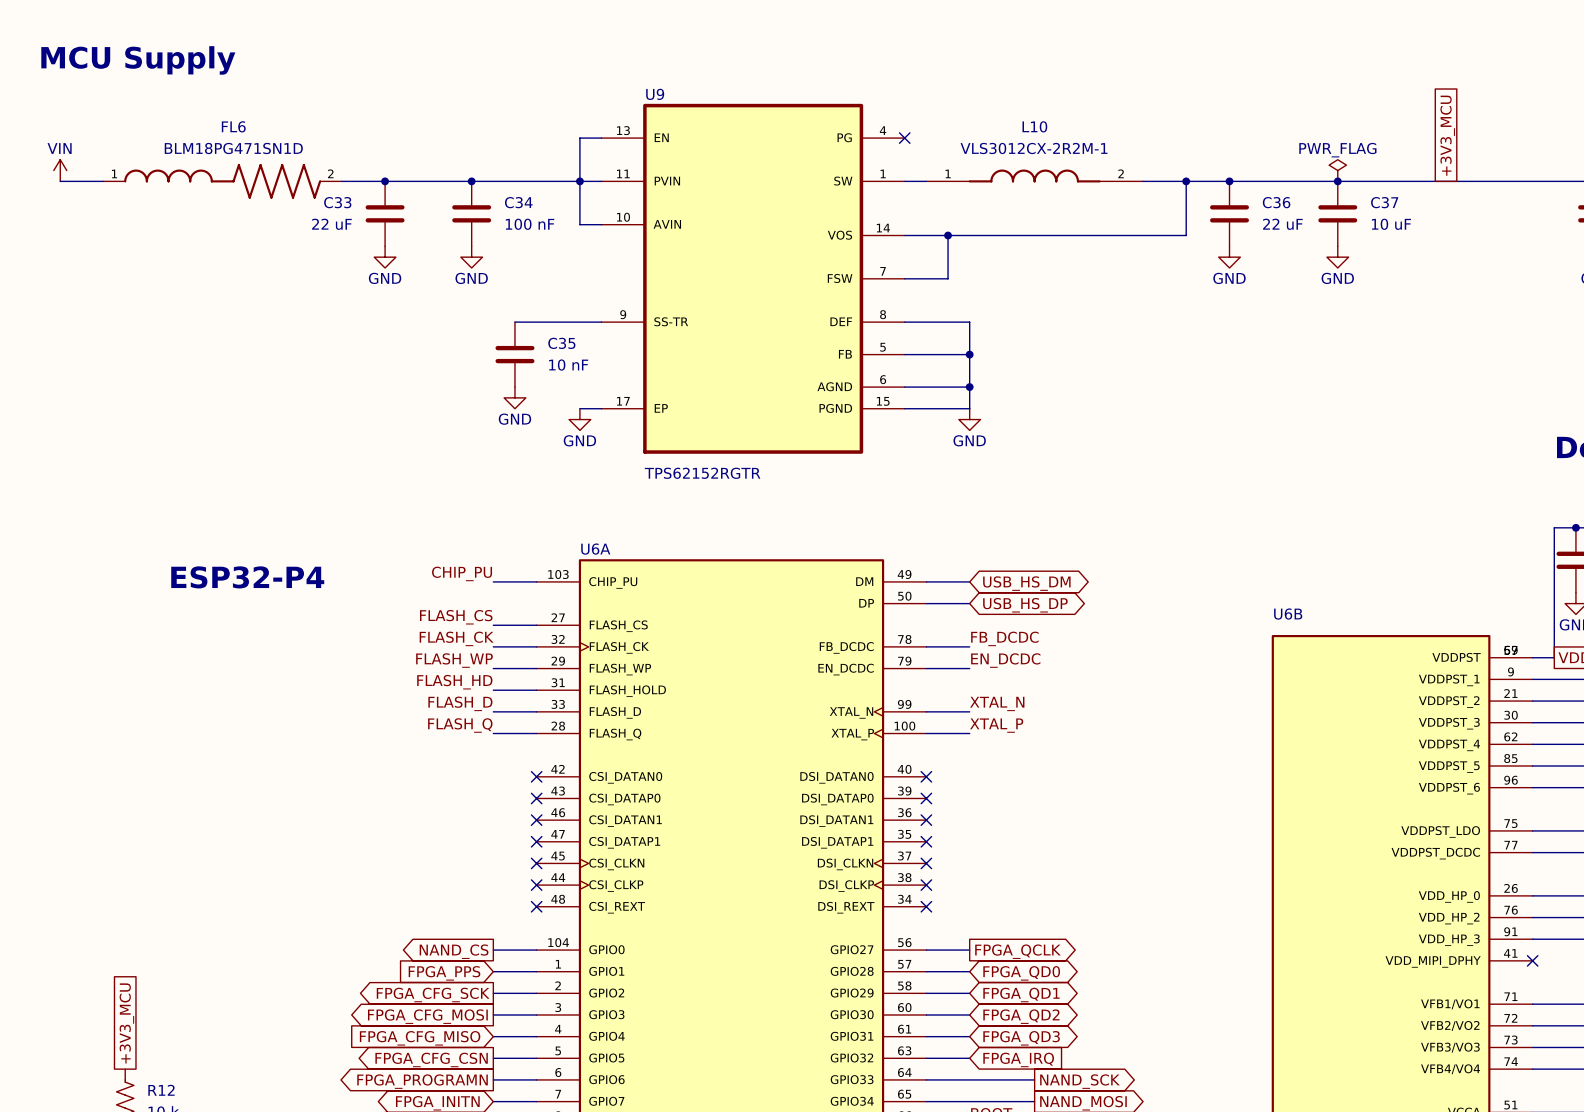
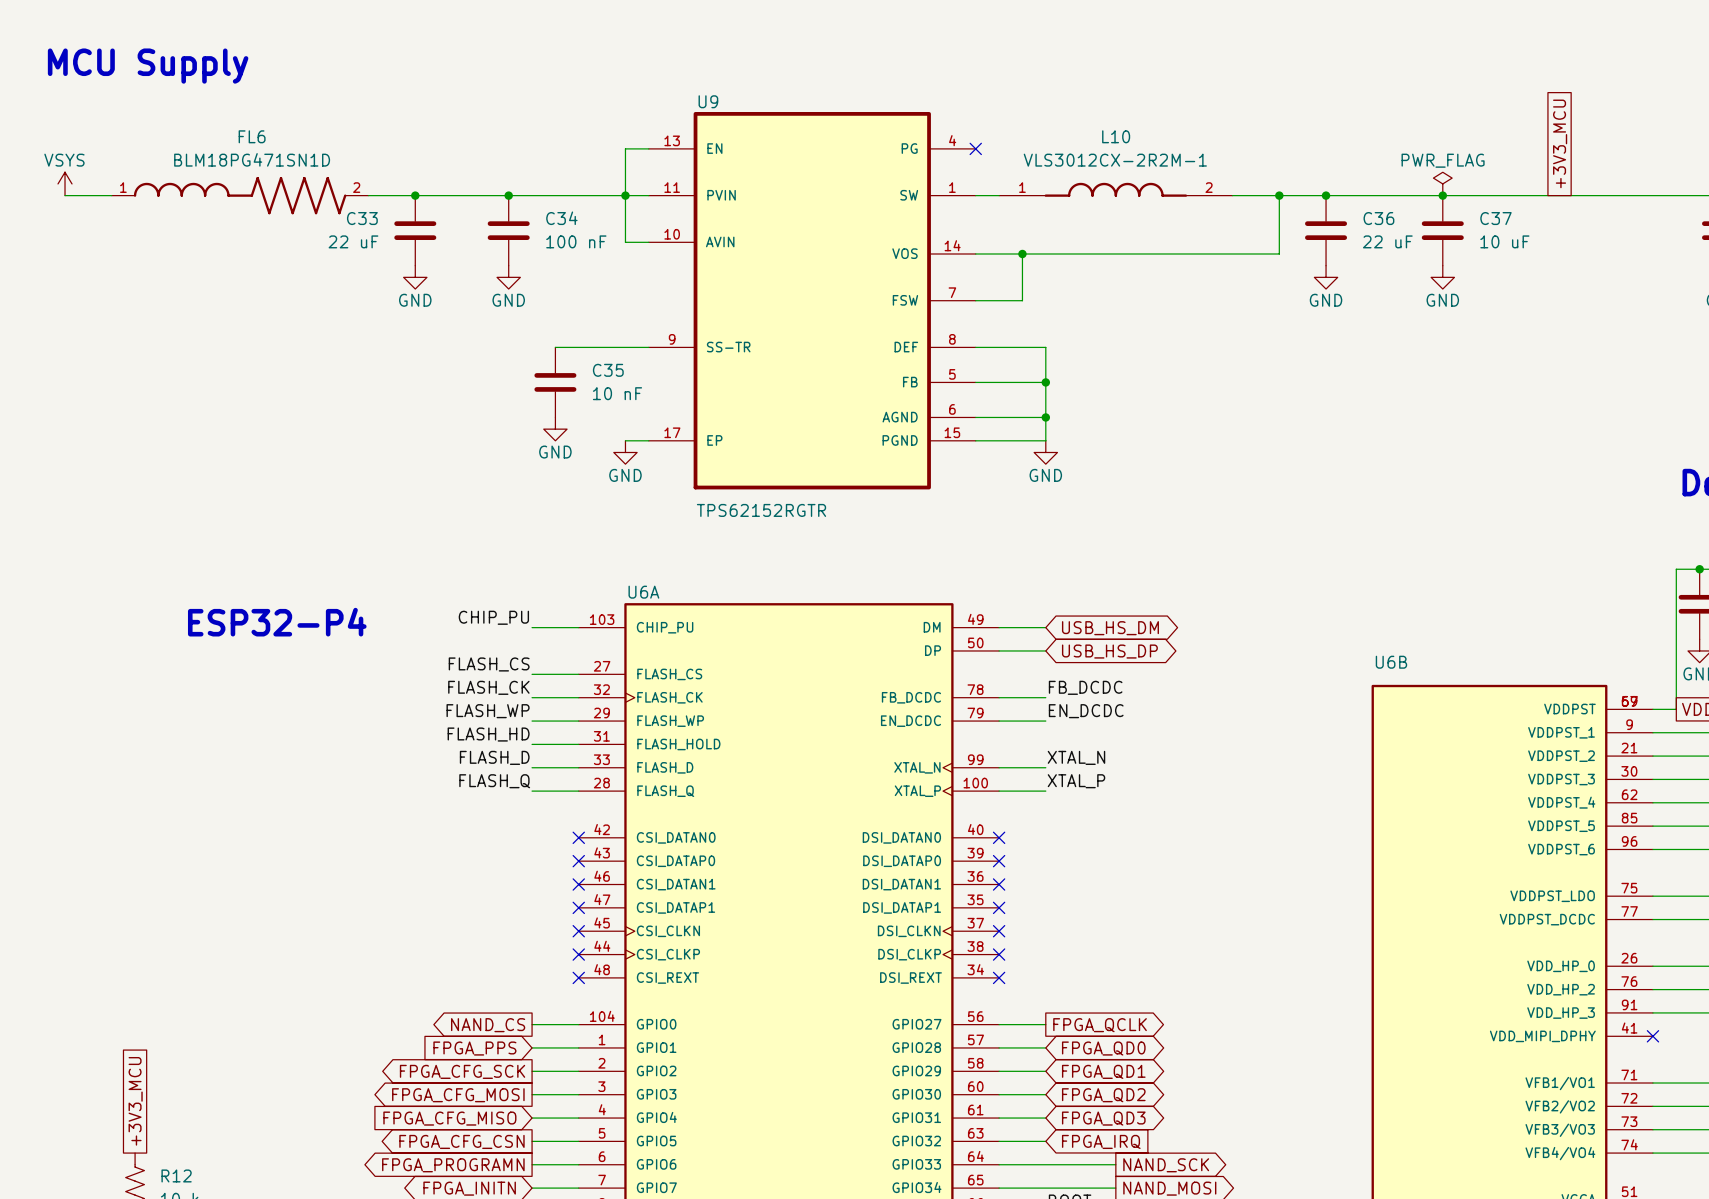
power symbol: VIN (60, 170) -> VSYS (65, 183)

